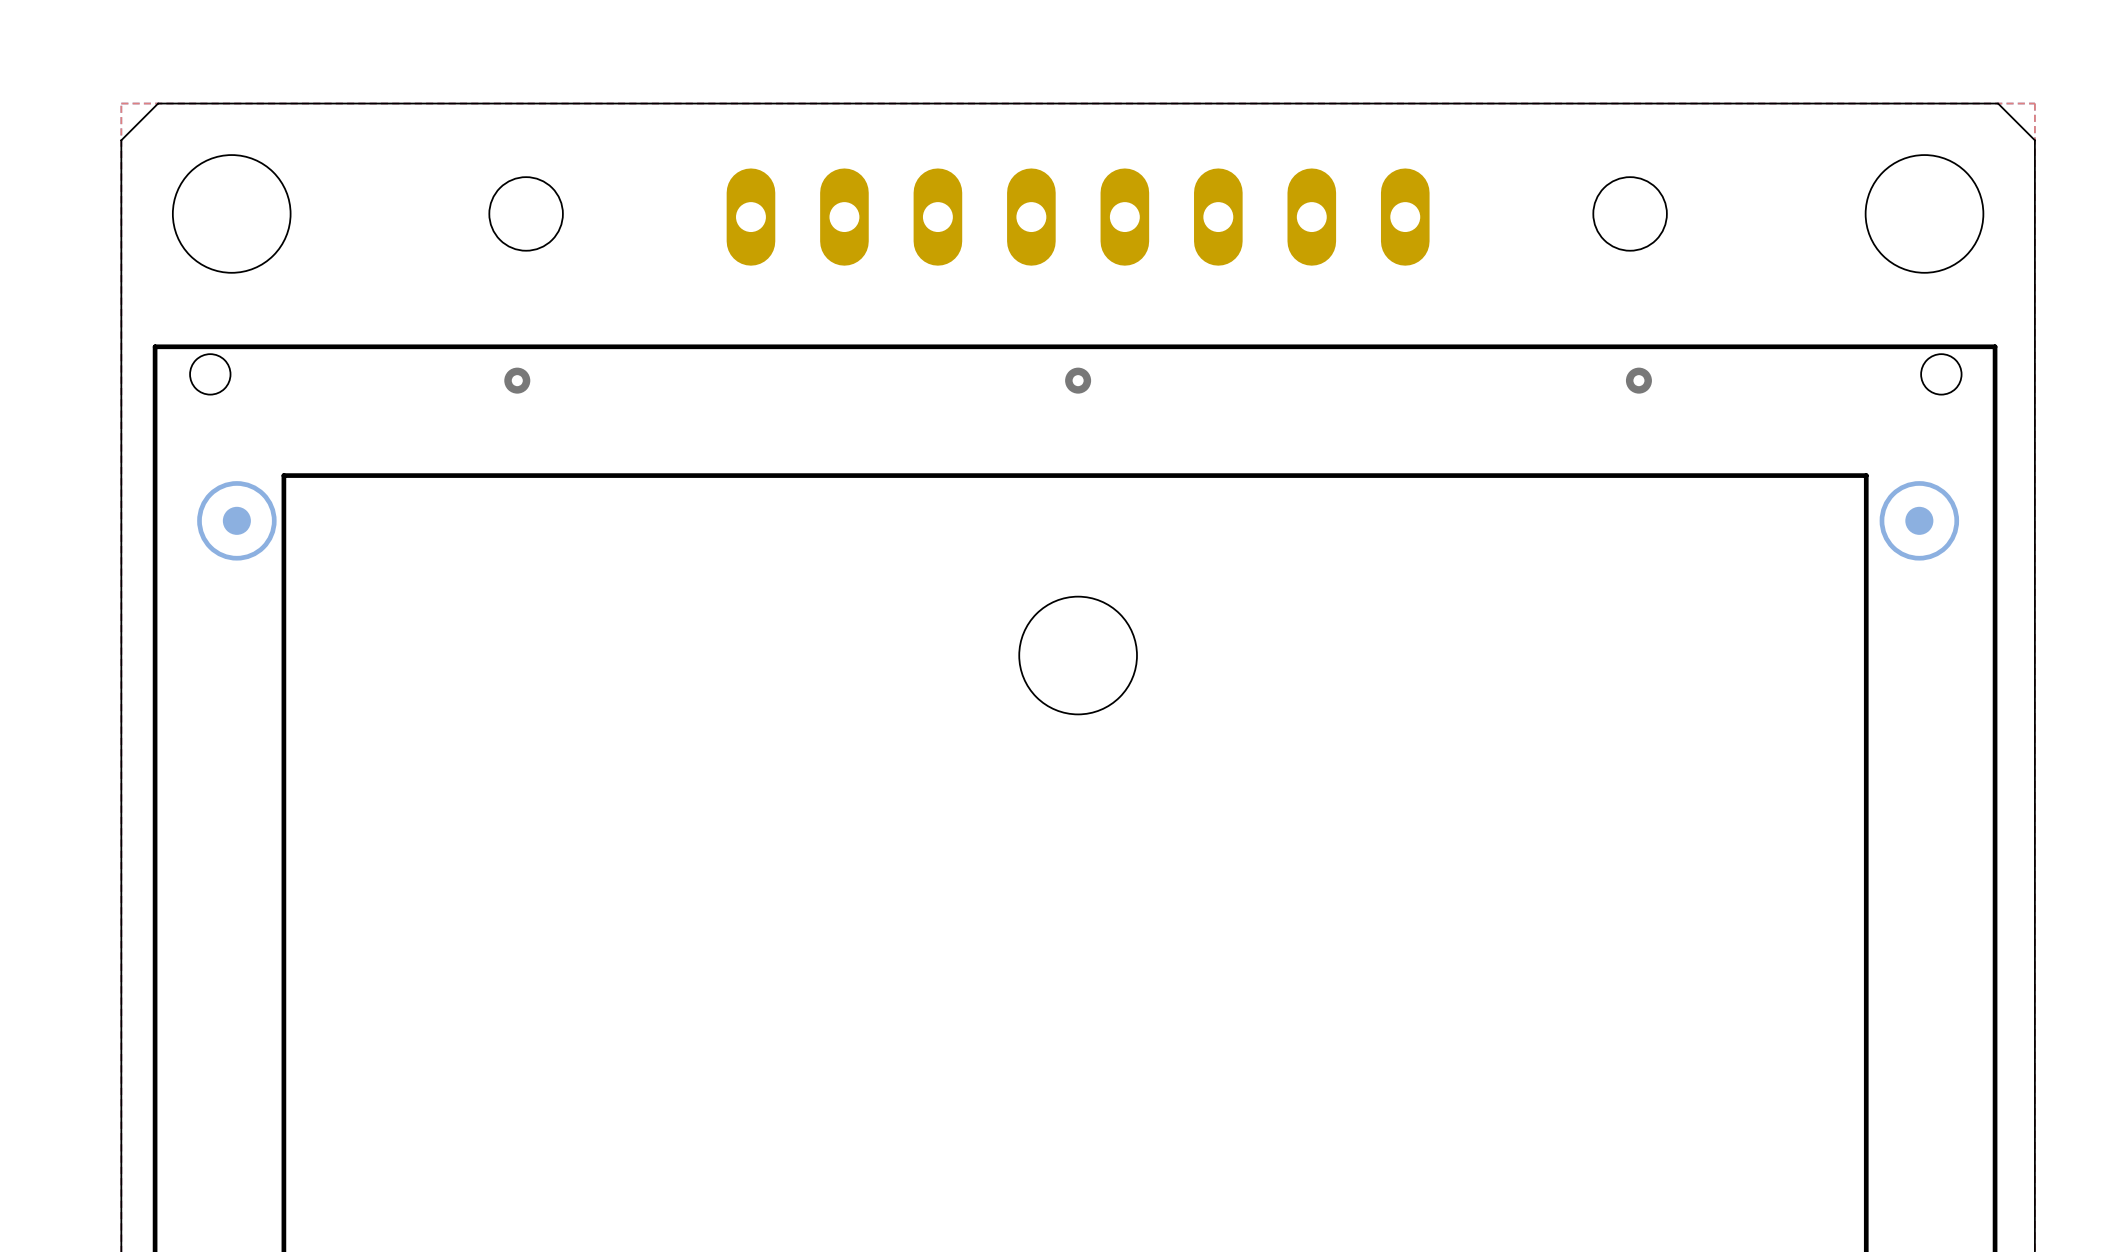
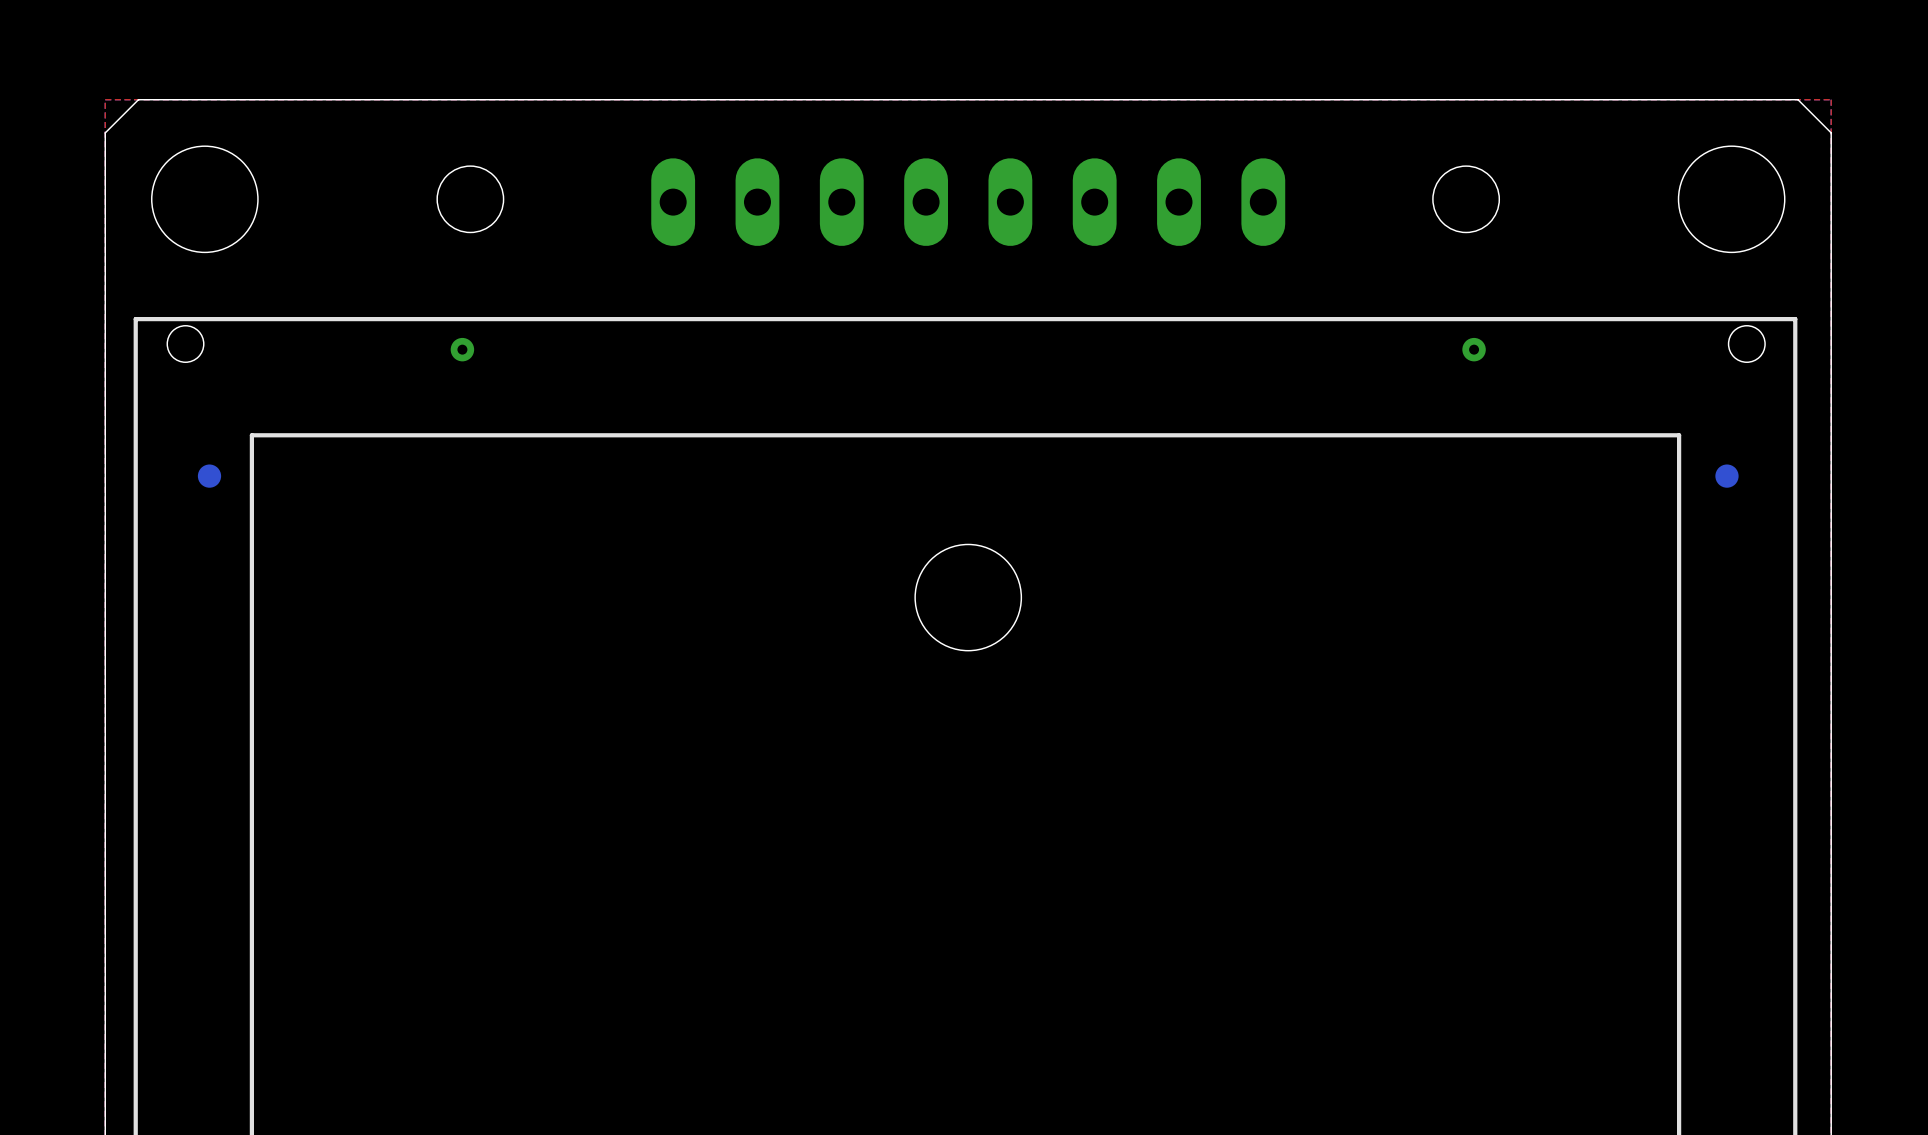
via: (1078, 380) -> none
part footprint: [197, 481, 277, 561] -> [197, 464, 222, 488]
part footprint: [1879, 481, 1960, 561] -> [1715, 464, 1739, 488]

